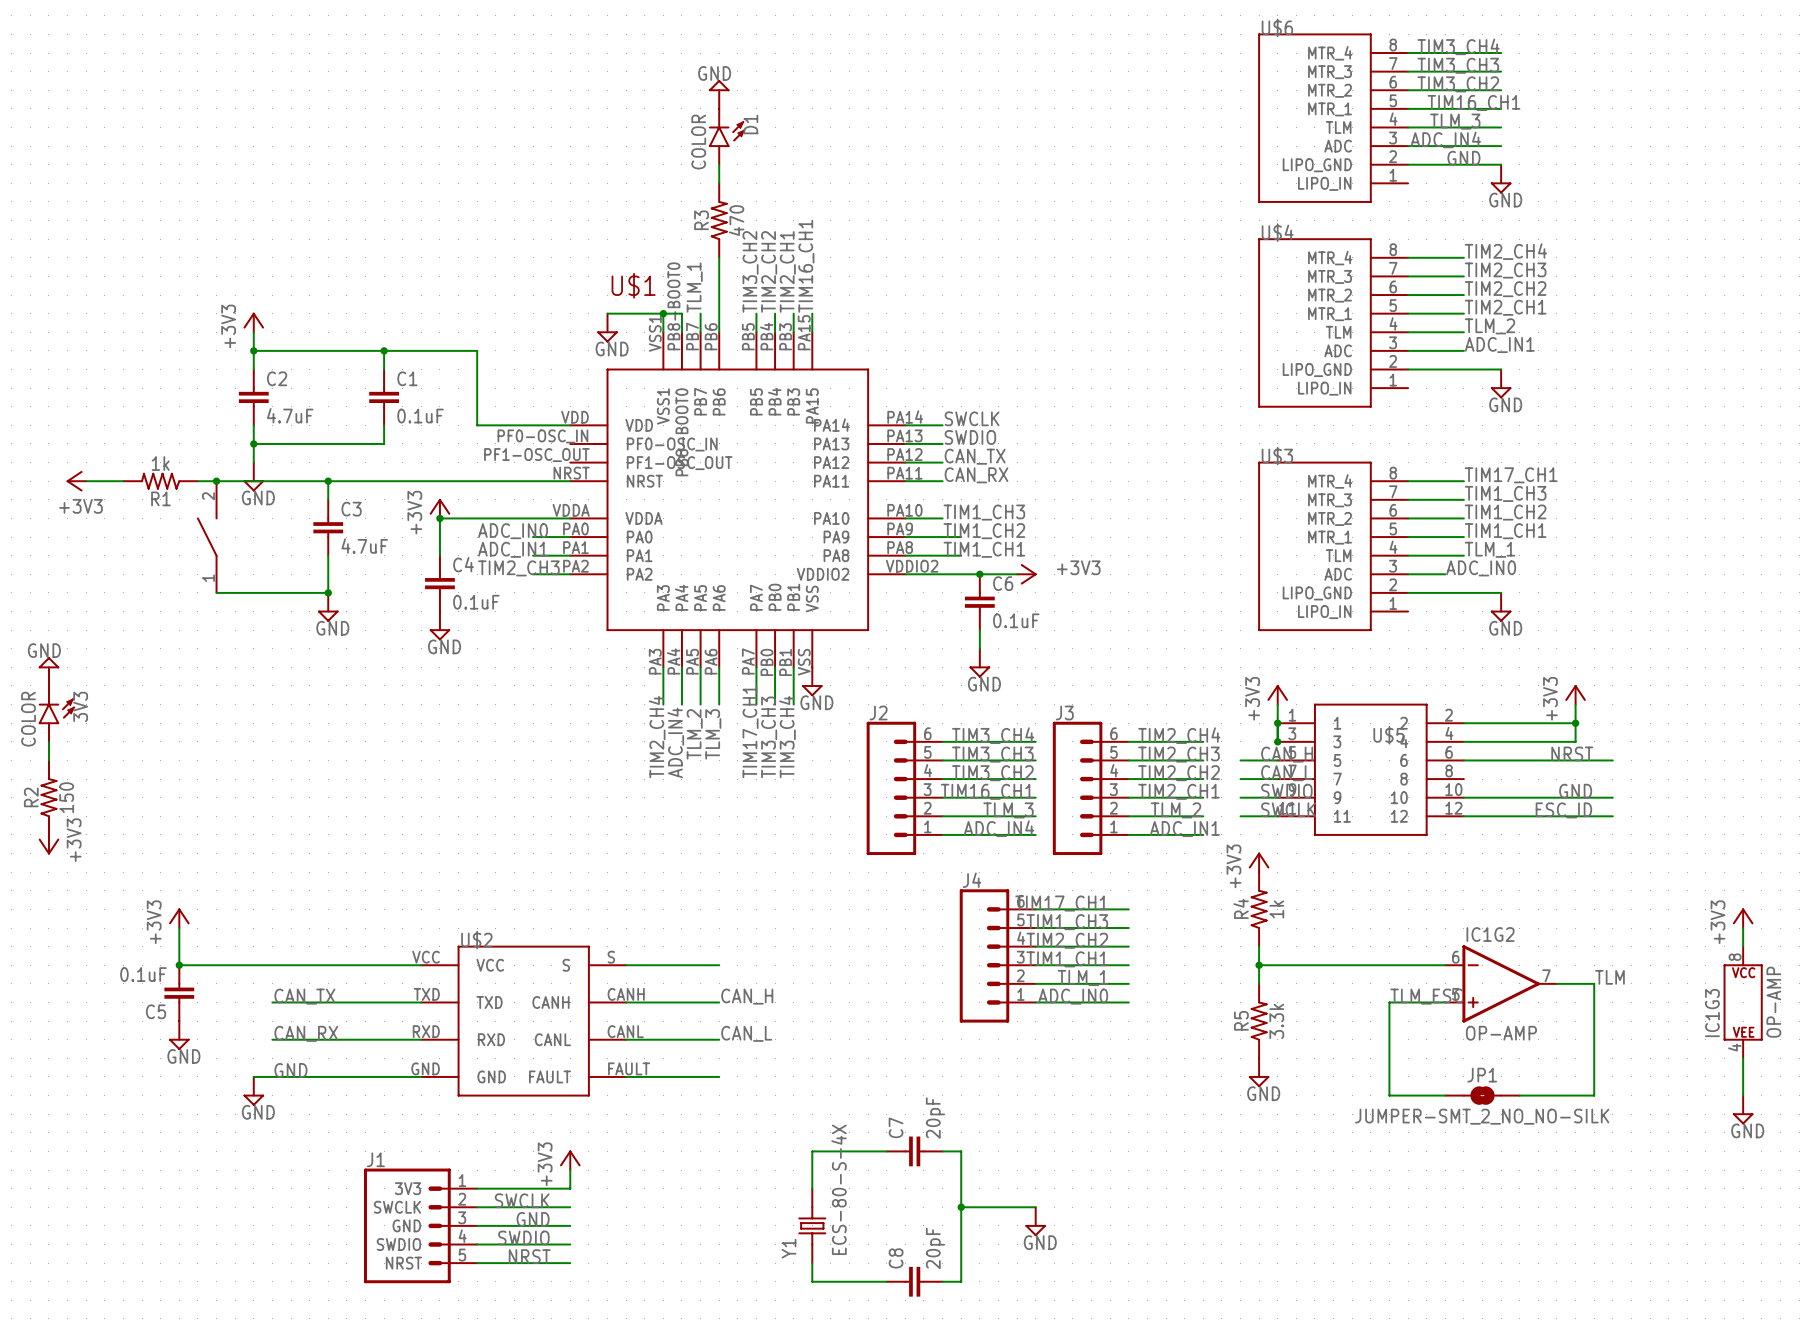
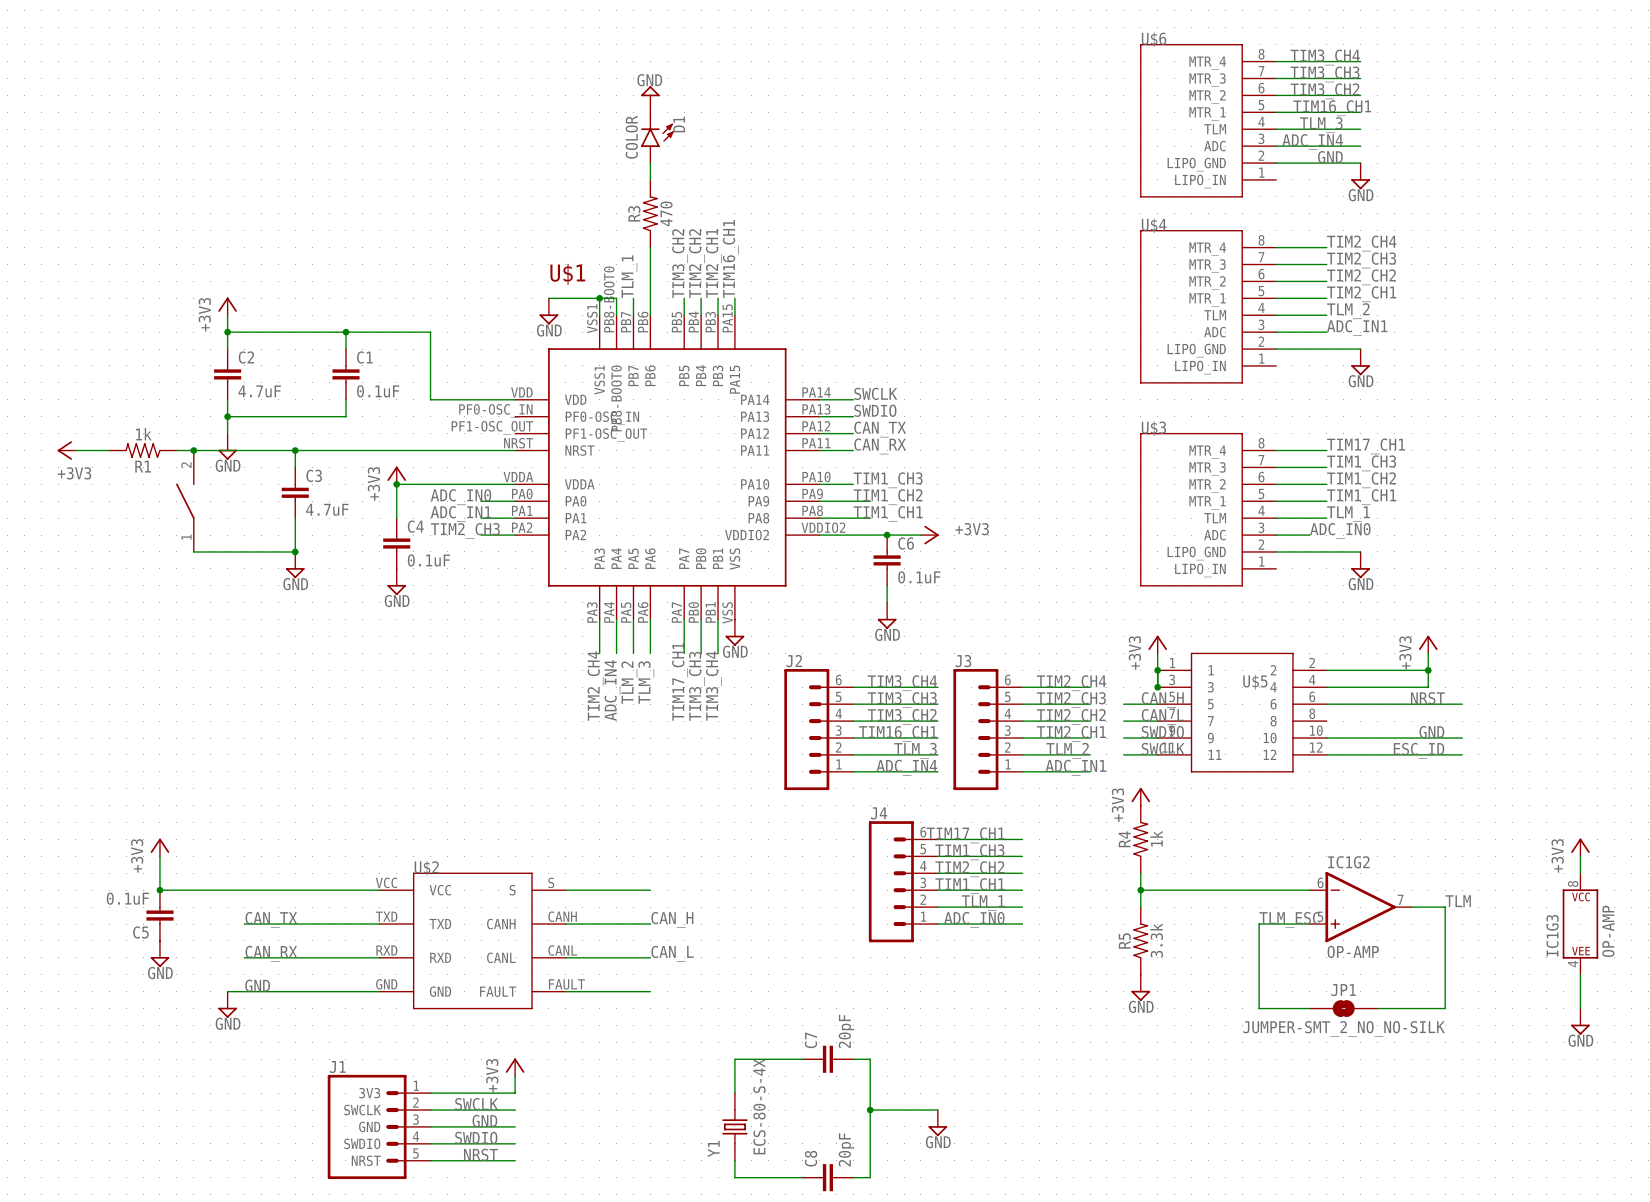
power symbol: GND (48, 671) -> none
3V3: COLOR (56, 713) -> none
wire: (48, 741) (48, 760) -> none
R2: 150 (48, 797) -> none
power symbol: +3V3 (48, 844) -> none

